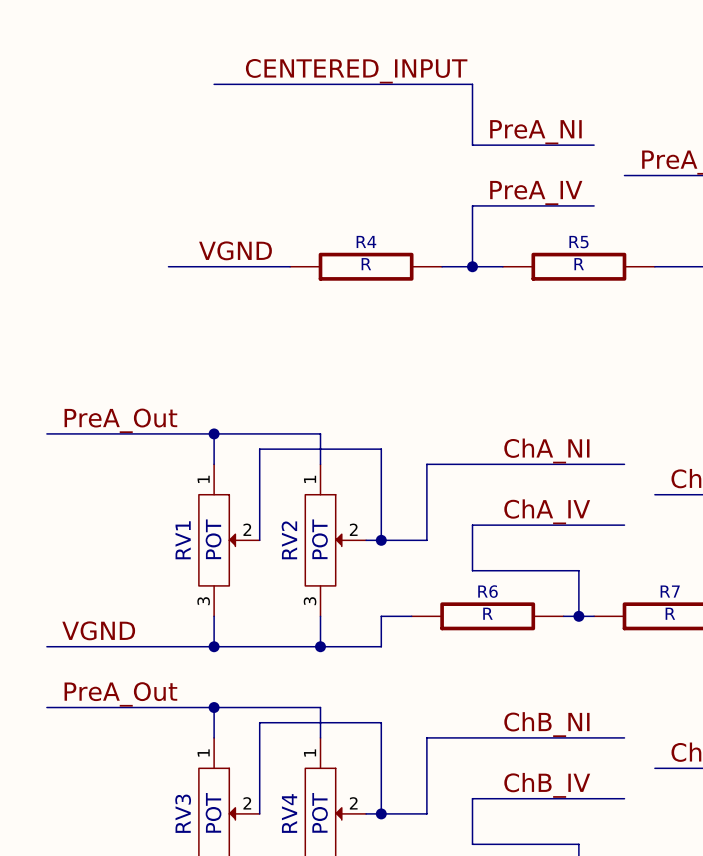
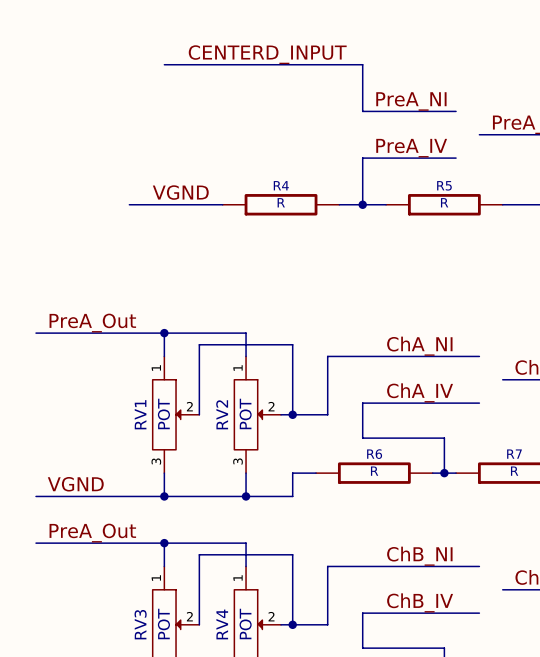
label: CENTERED_INPUT (356, 71) -> CENTERD_INPUT (267, 54)

